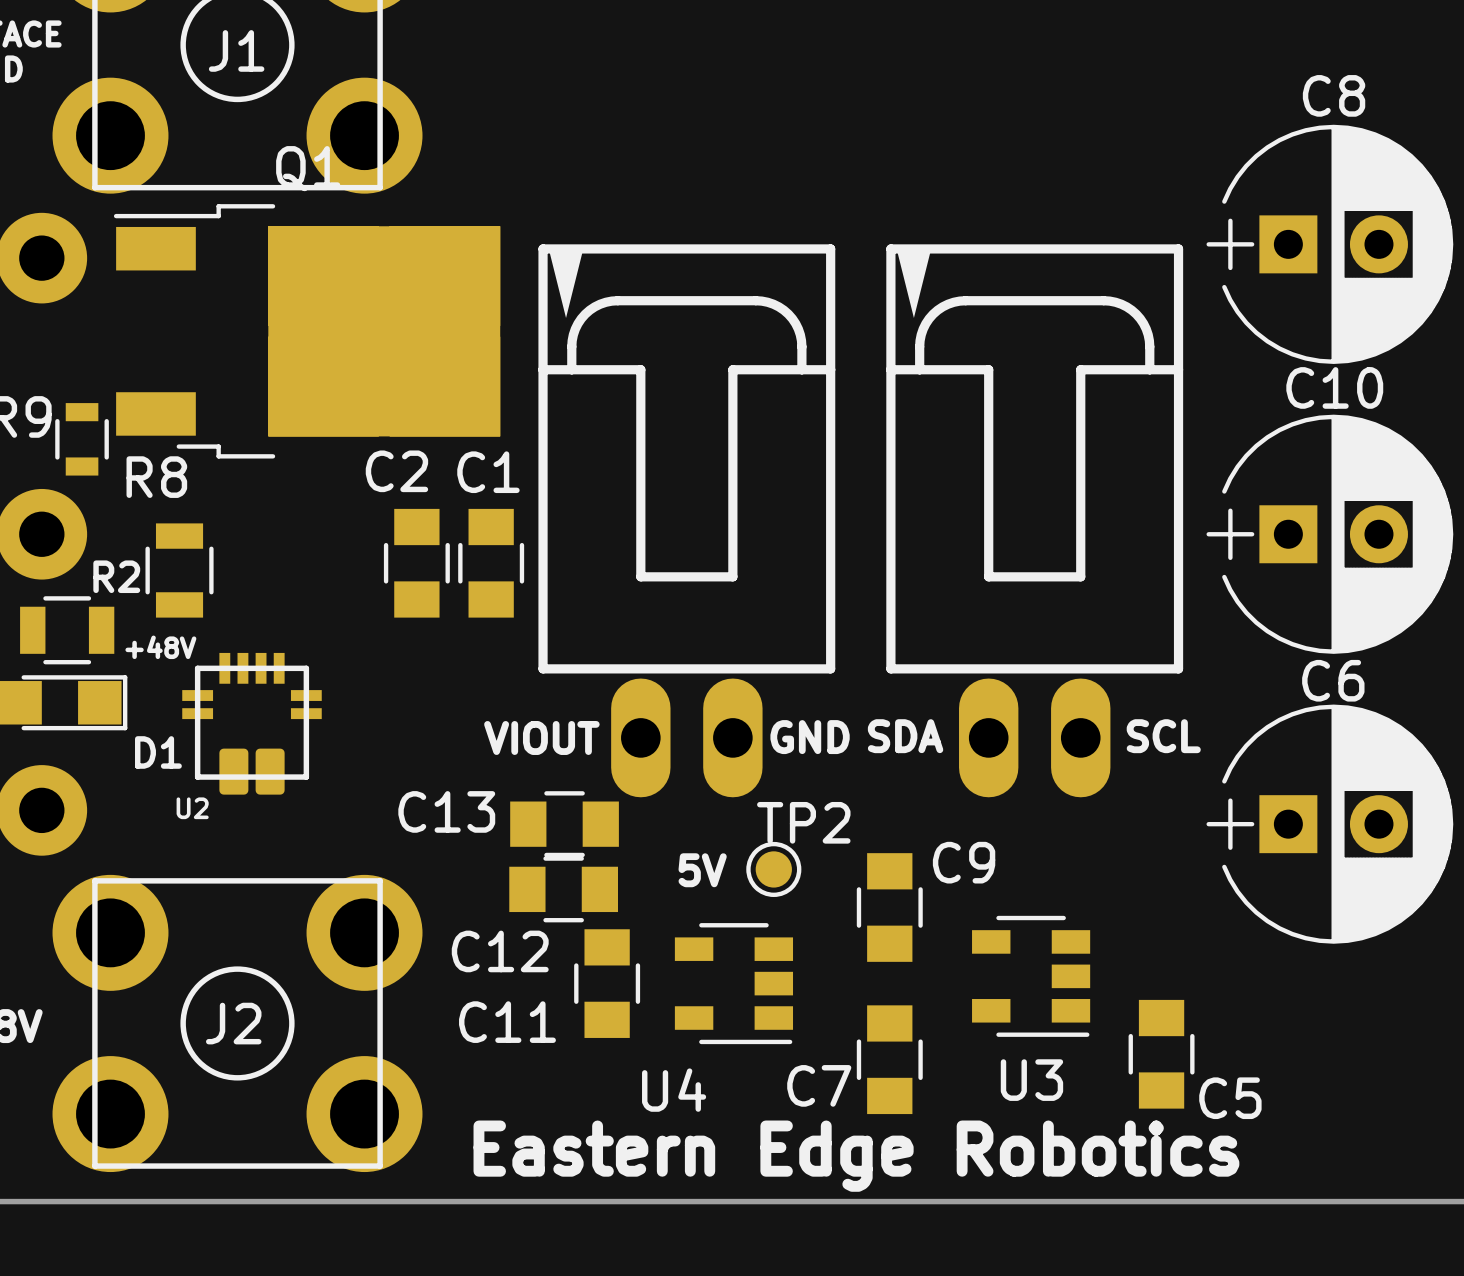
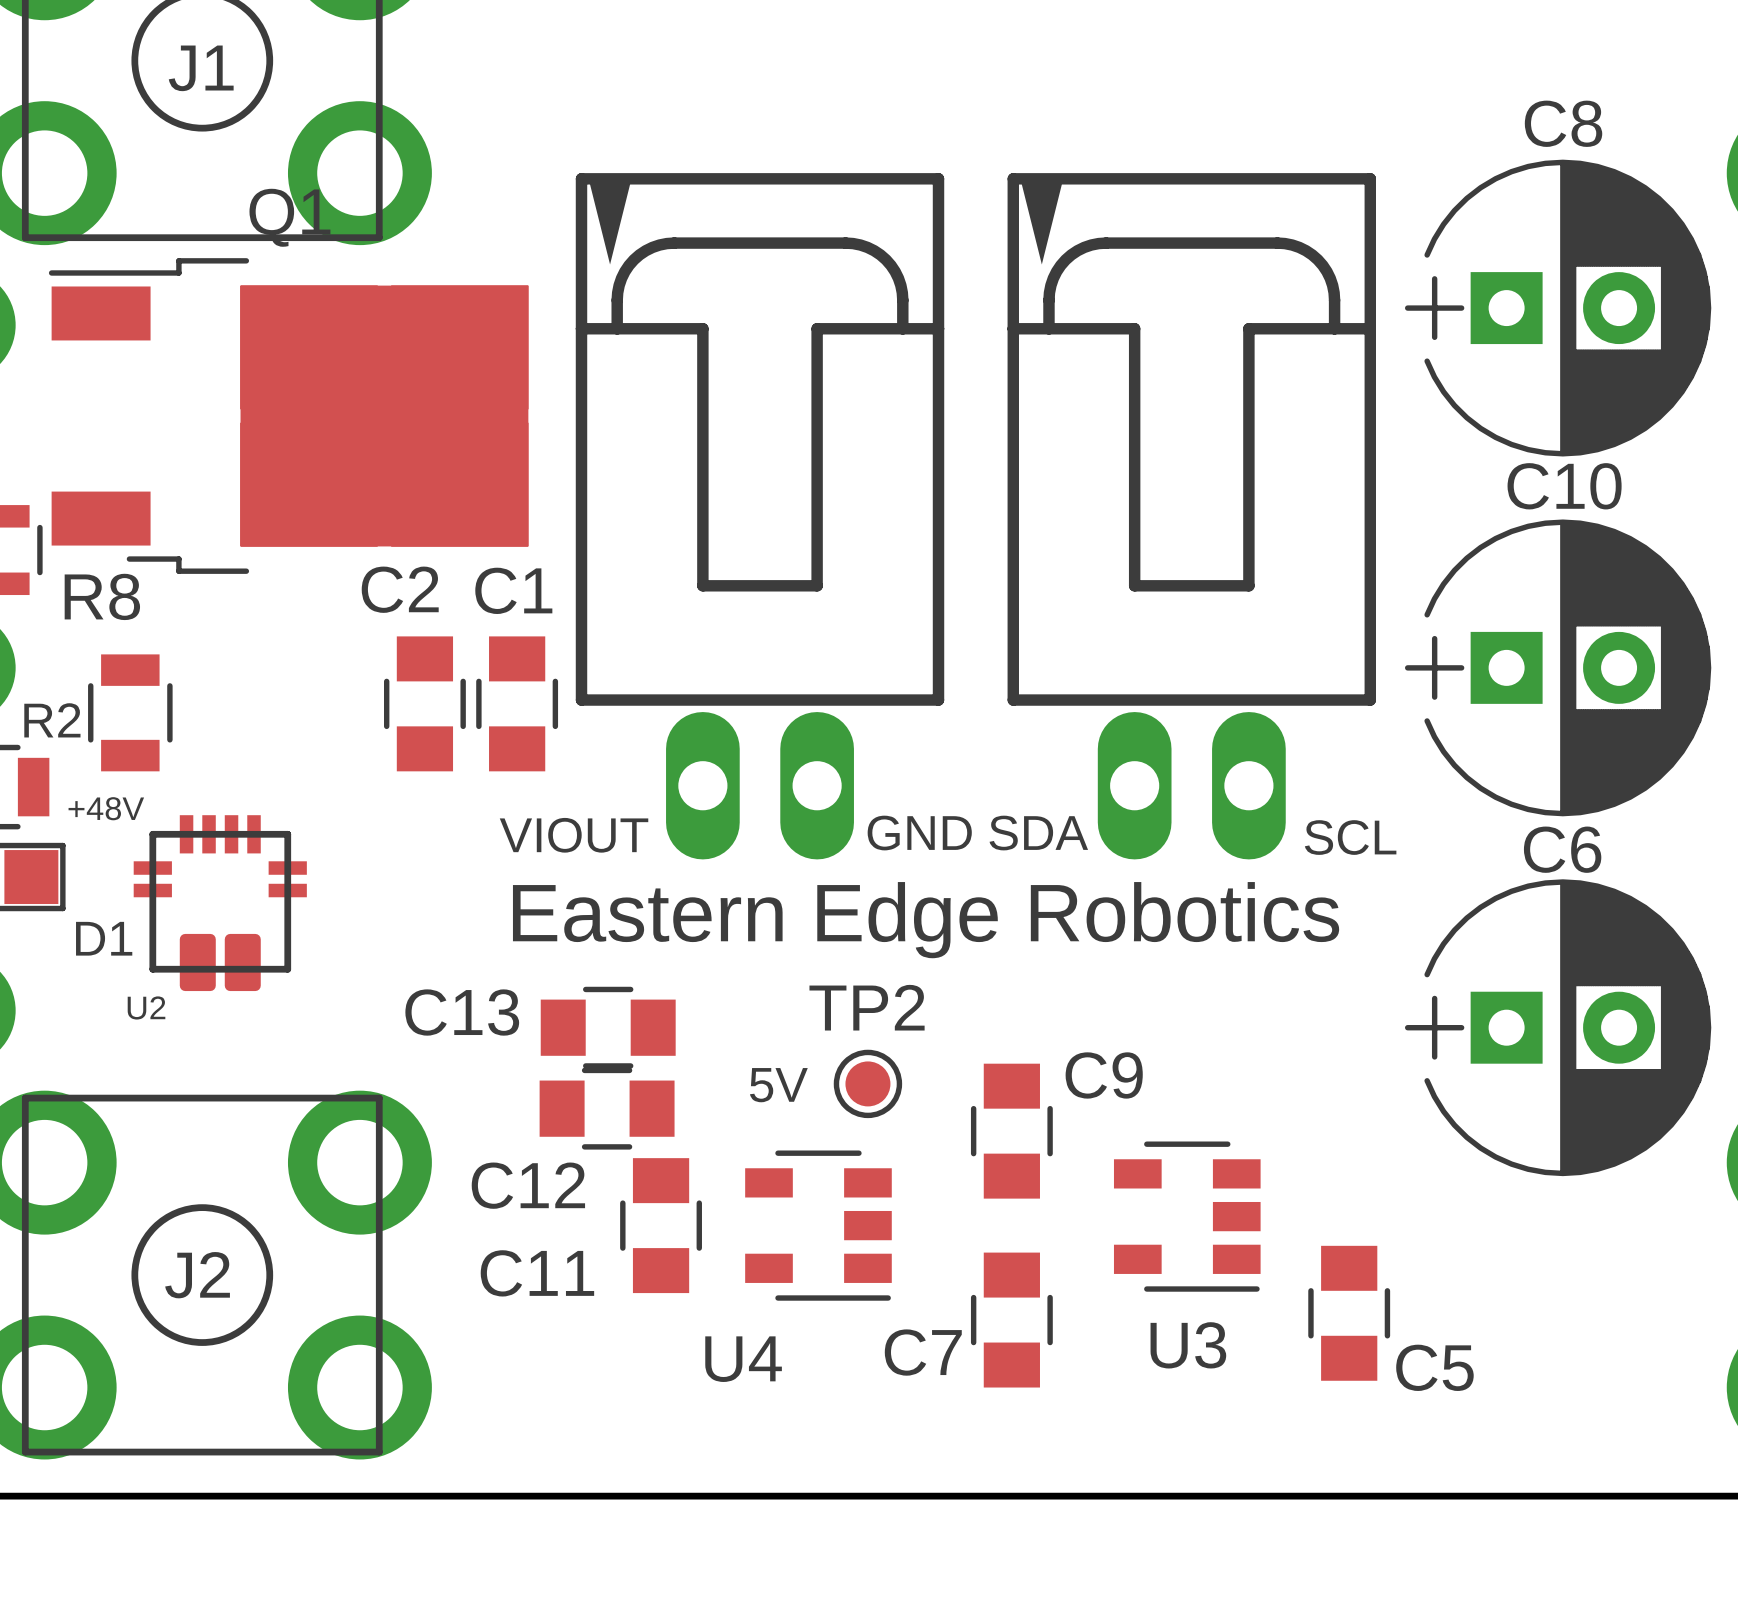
part position: (686, 520) -> (760, 516)
part position: (1034, 520) -> (1191, 516)
text: none -> GND (919, 833)
text position: SDA (905, 736) -> SDA (1038, 833)
text position: SCL (1163, 736) -> SCL (1350, 837)
text position: VIOUT (541, 737) -> VIOUT (574, 835)
text: GND (810, 737) -> Eastern Edge Robotics (926, 920)
TP2 name position: TP2 (803, 822) -> TP2 (867, 1007)
text: Eastern Edge Robotics (856, 1156) -> none

